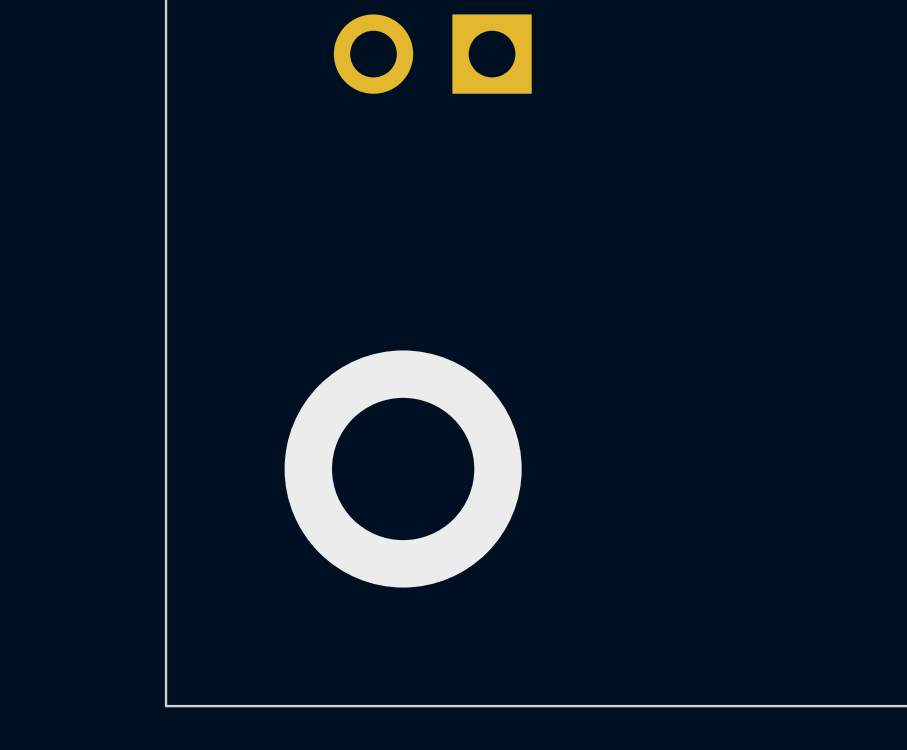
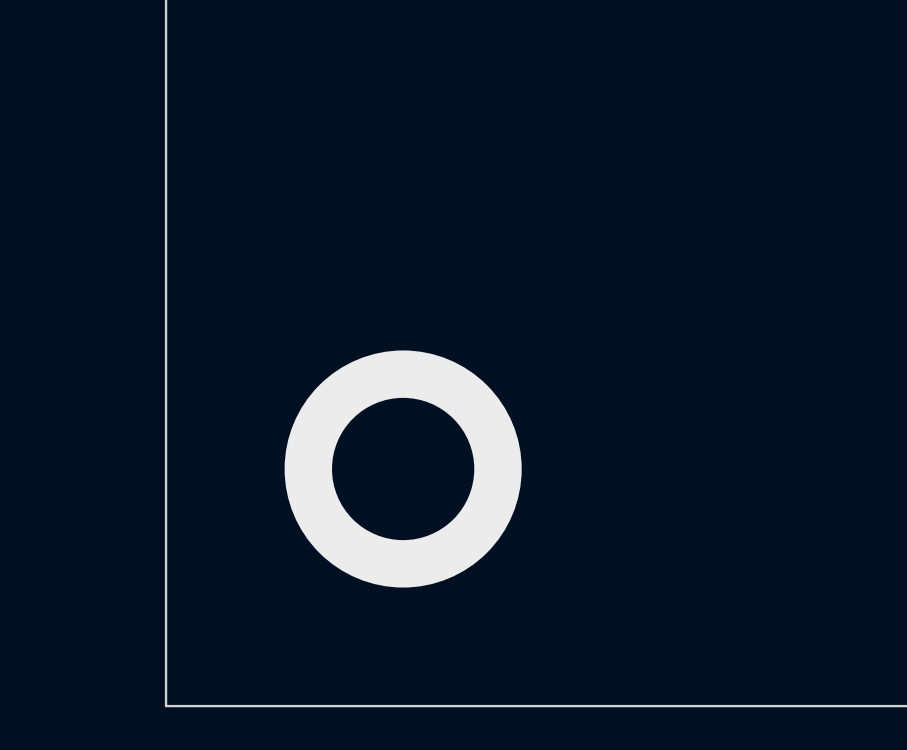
part: (432, 54) -> none

